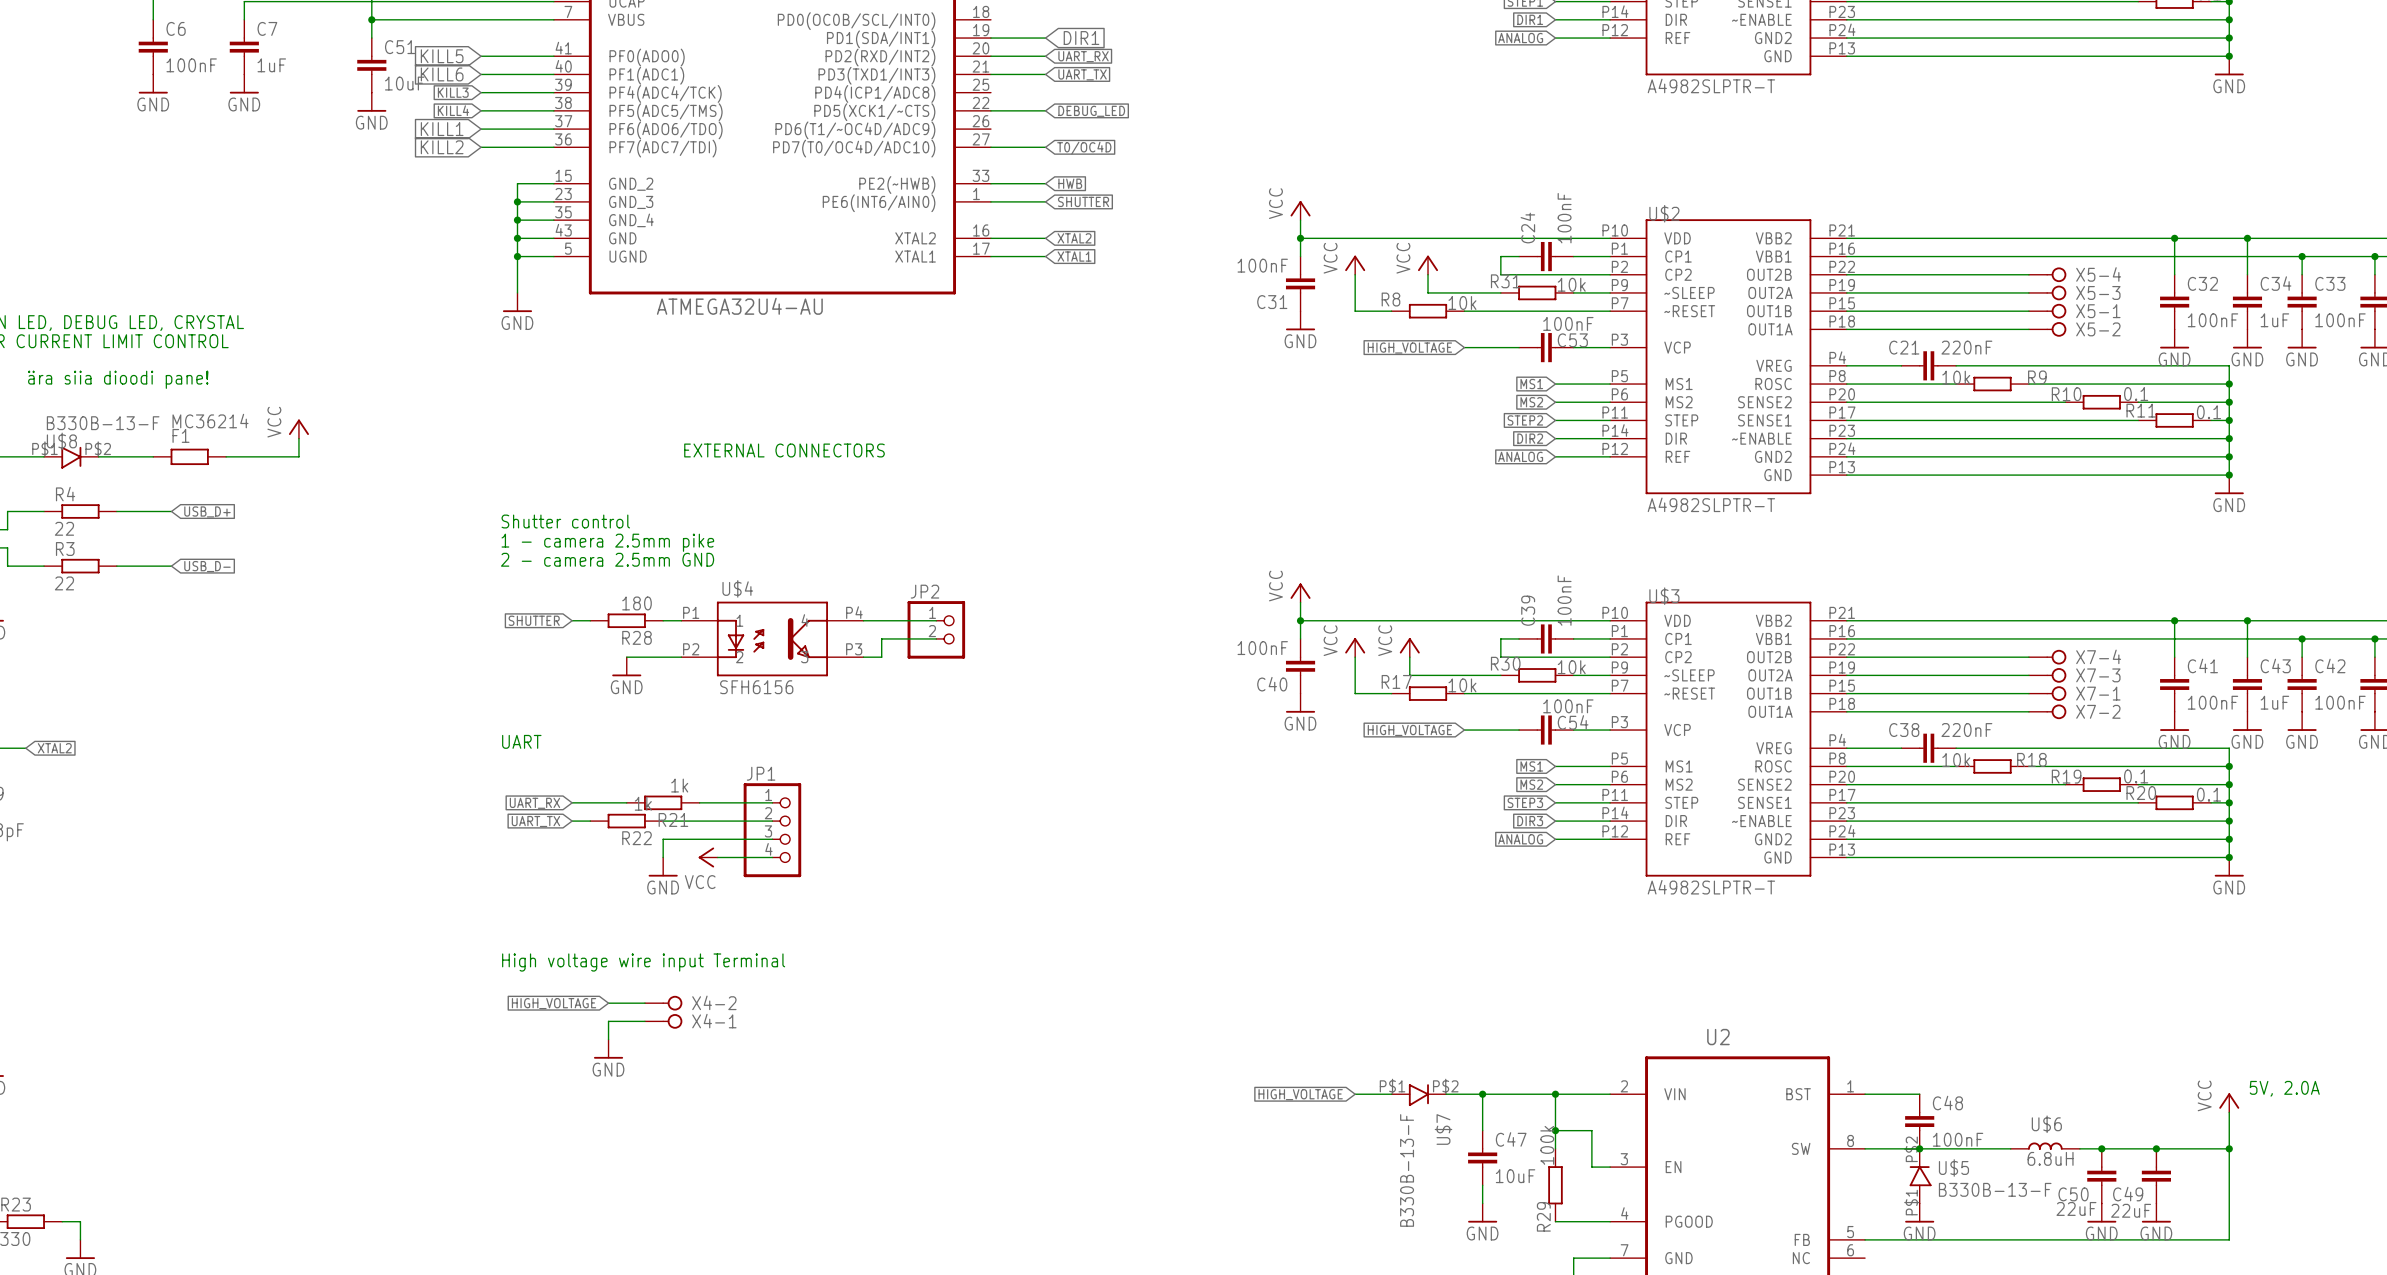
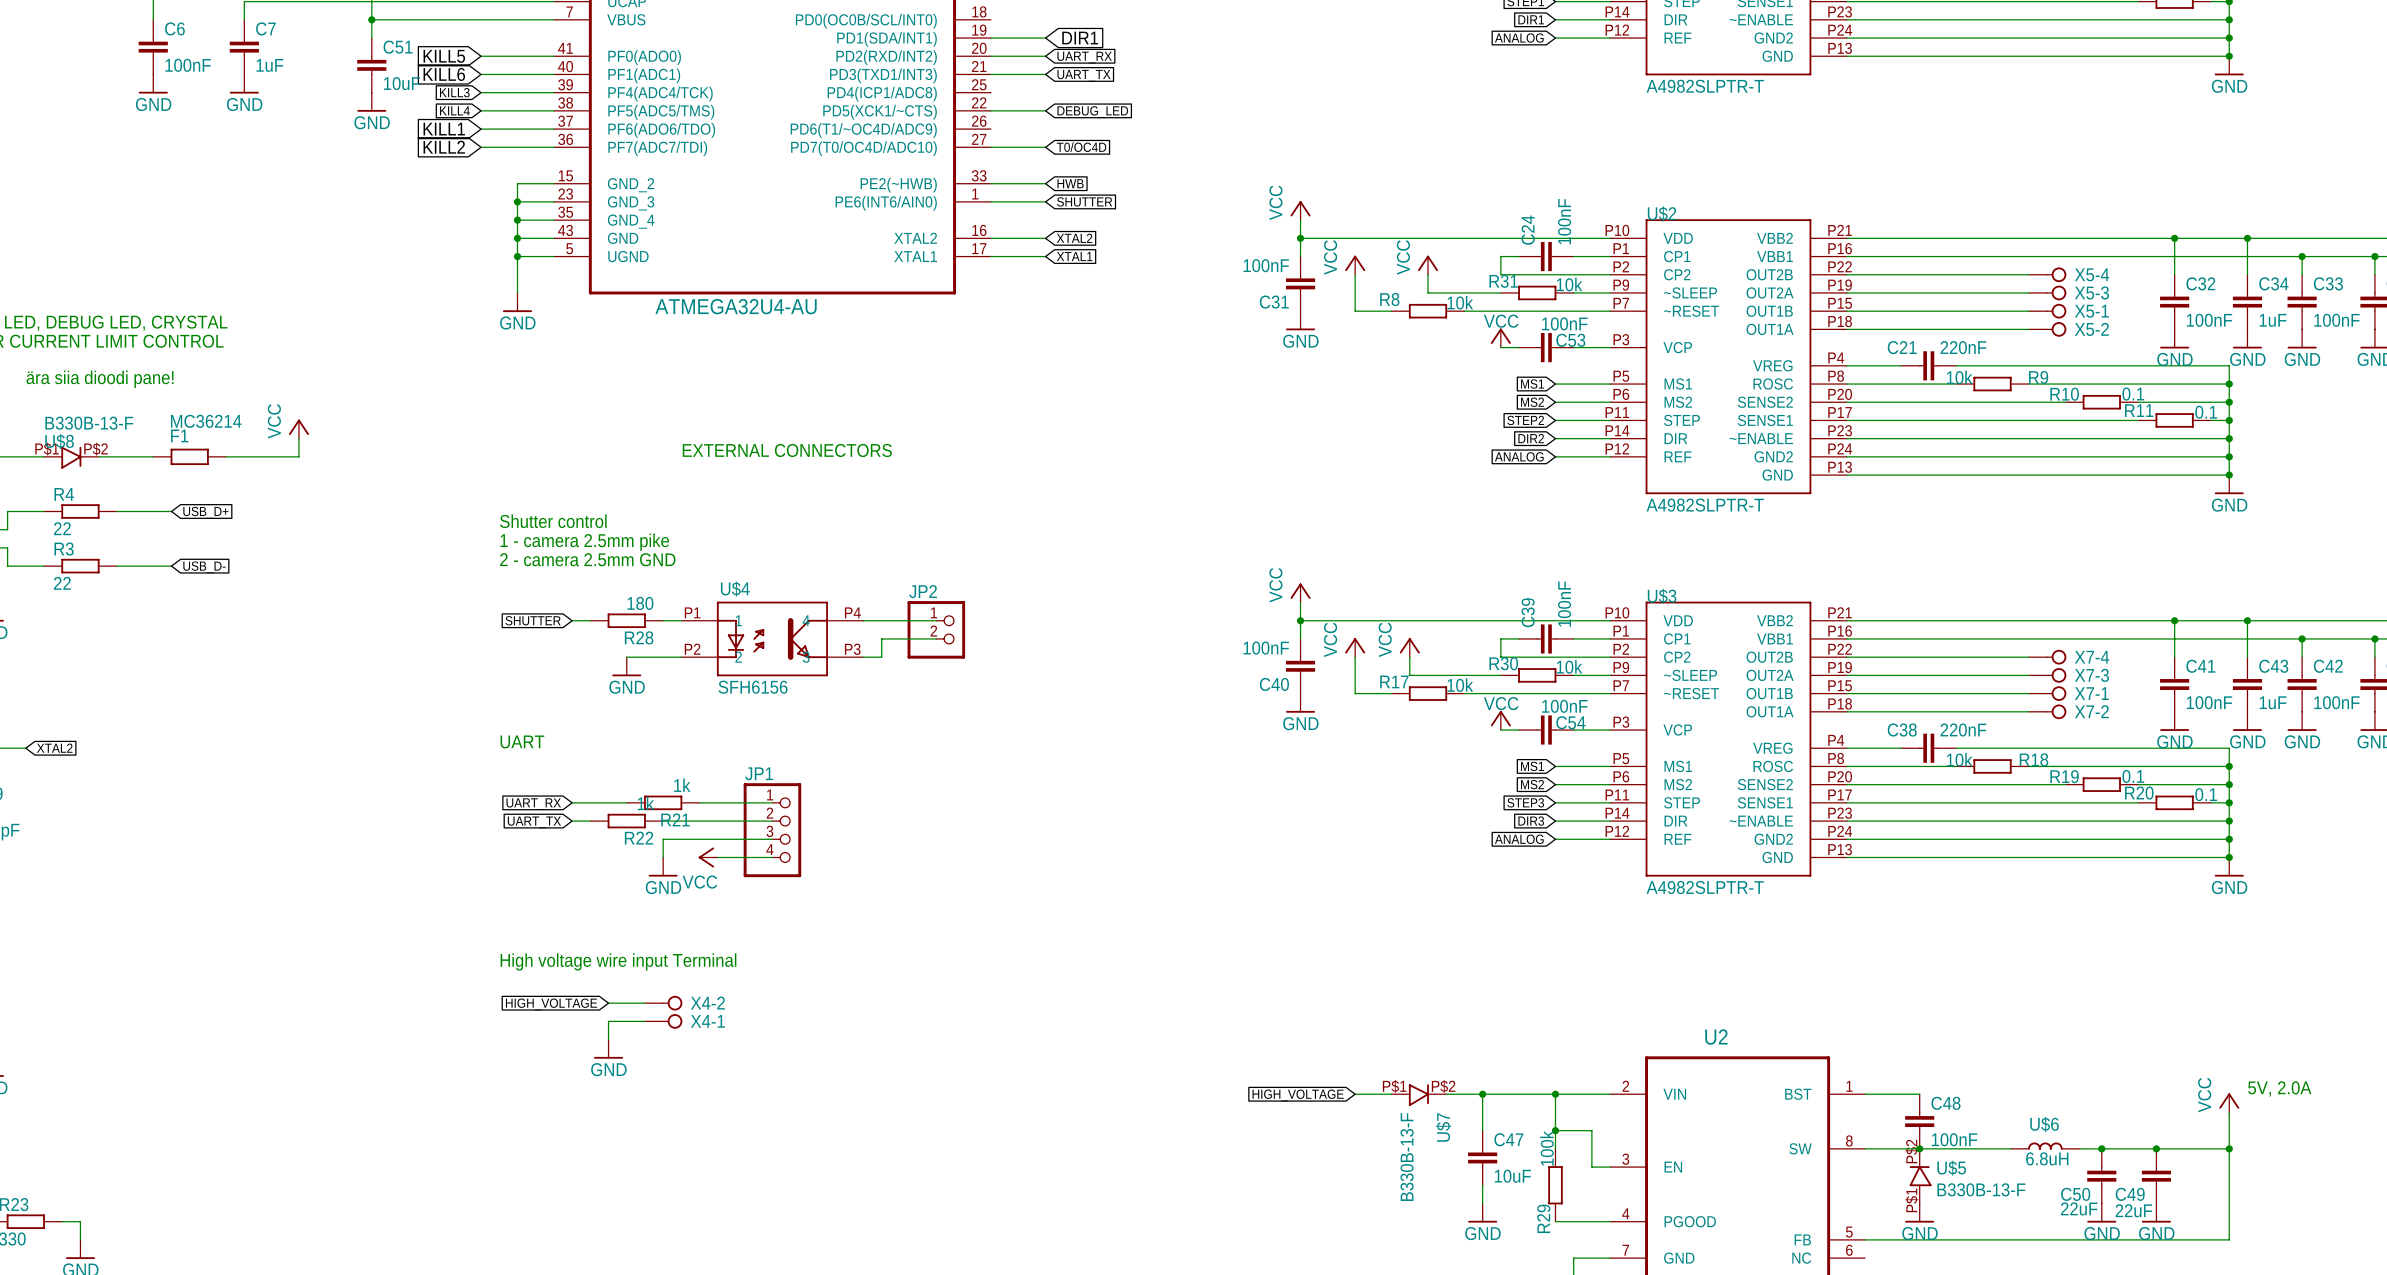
power symbol: none -> VCC (1500, 338)
wire: (1464, 347) (1500, 347) -> none
global label: HIGH_VOLTAGE (1409, 348) -> none
power symbol: none -> VCC (1500, 720)
global label: HIGH_VOLTAGE (1409, 730) -> none
wire: (1464, 730) (1500, 730) -> none

